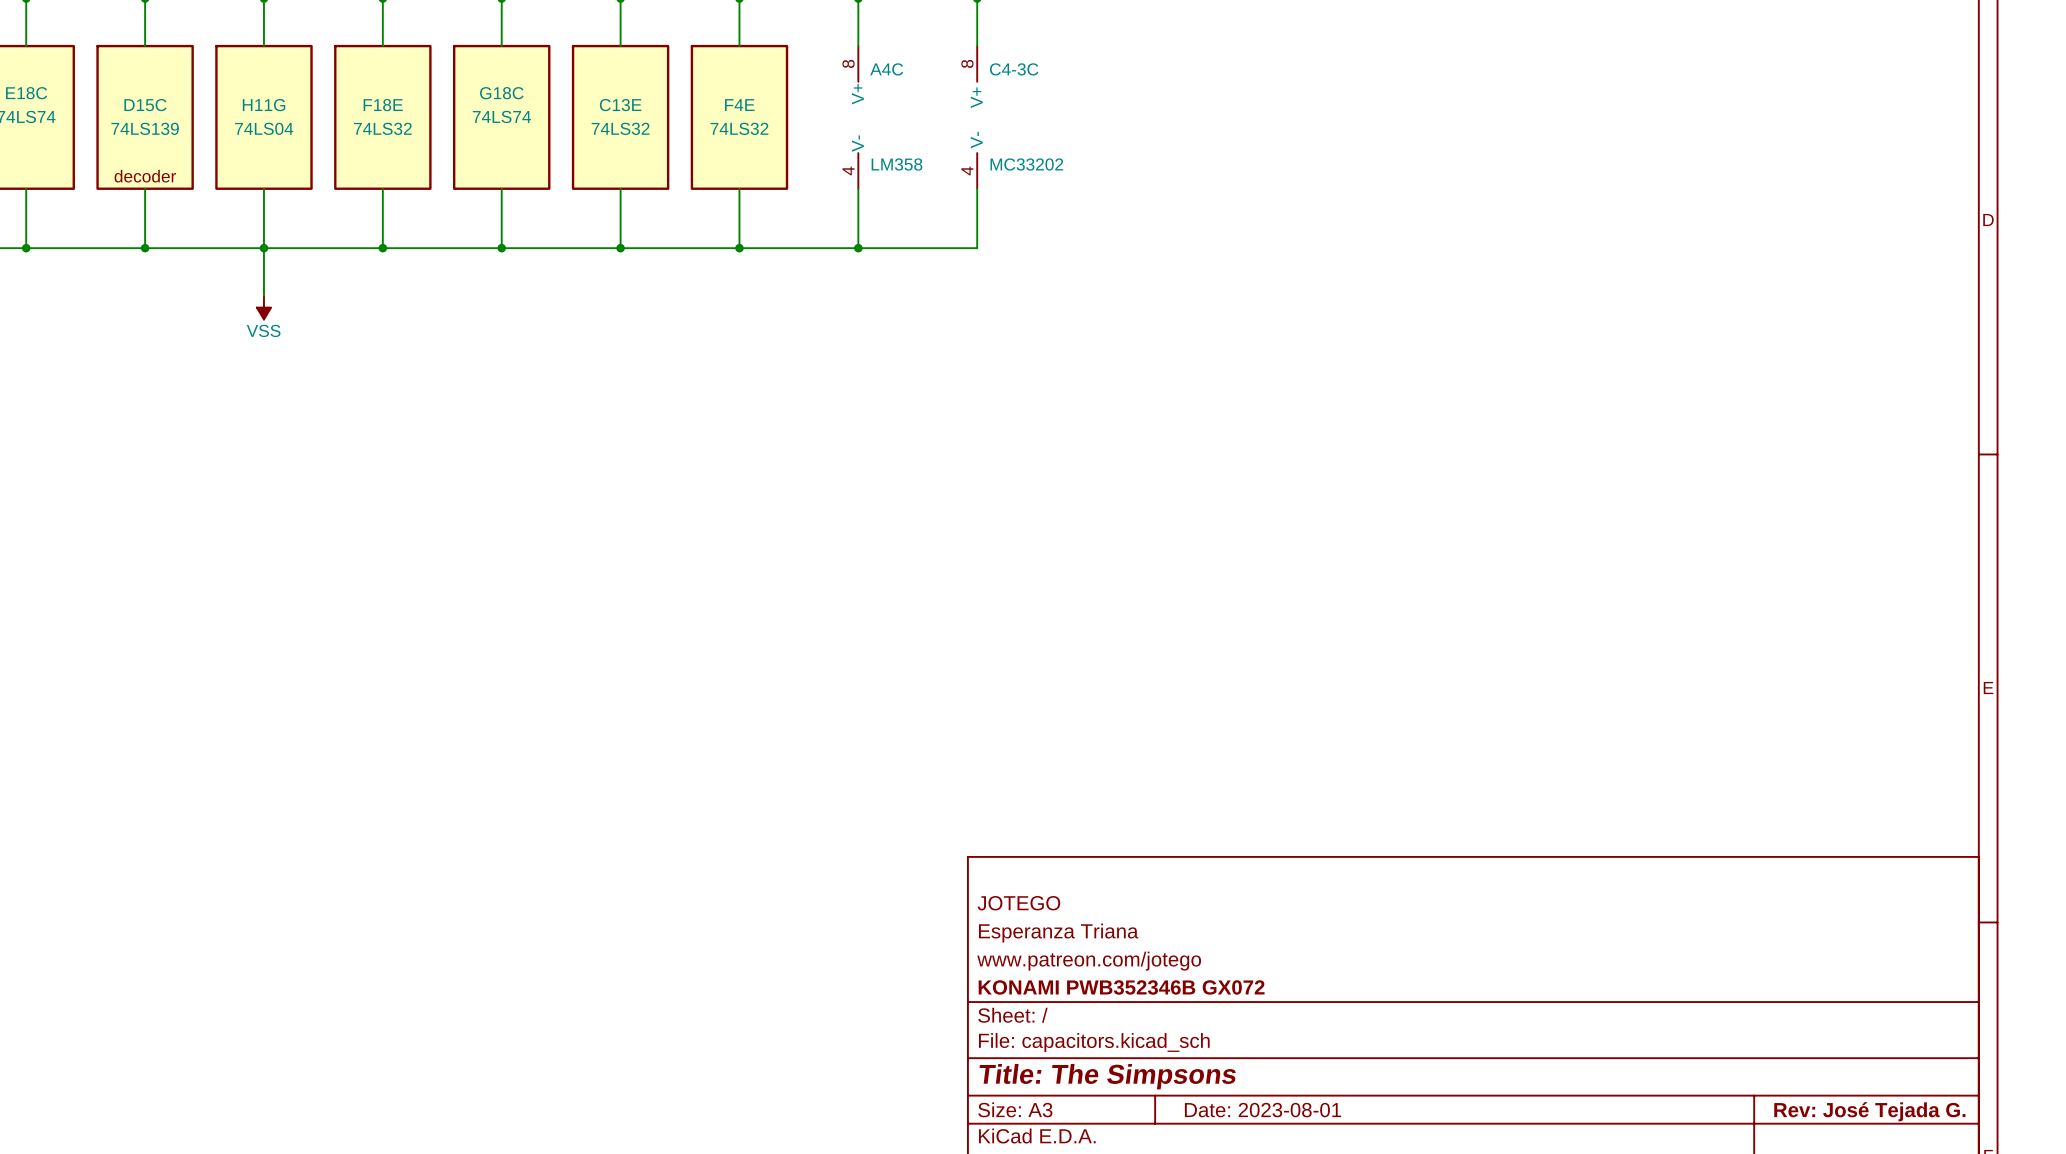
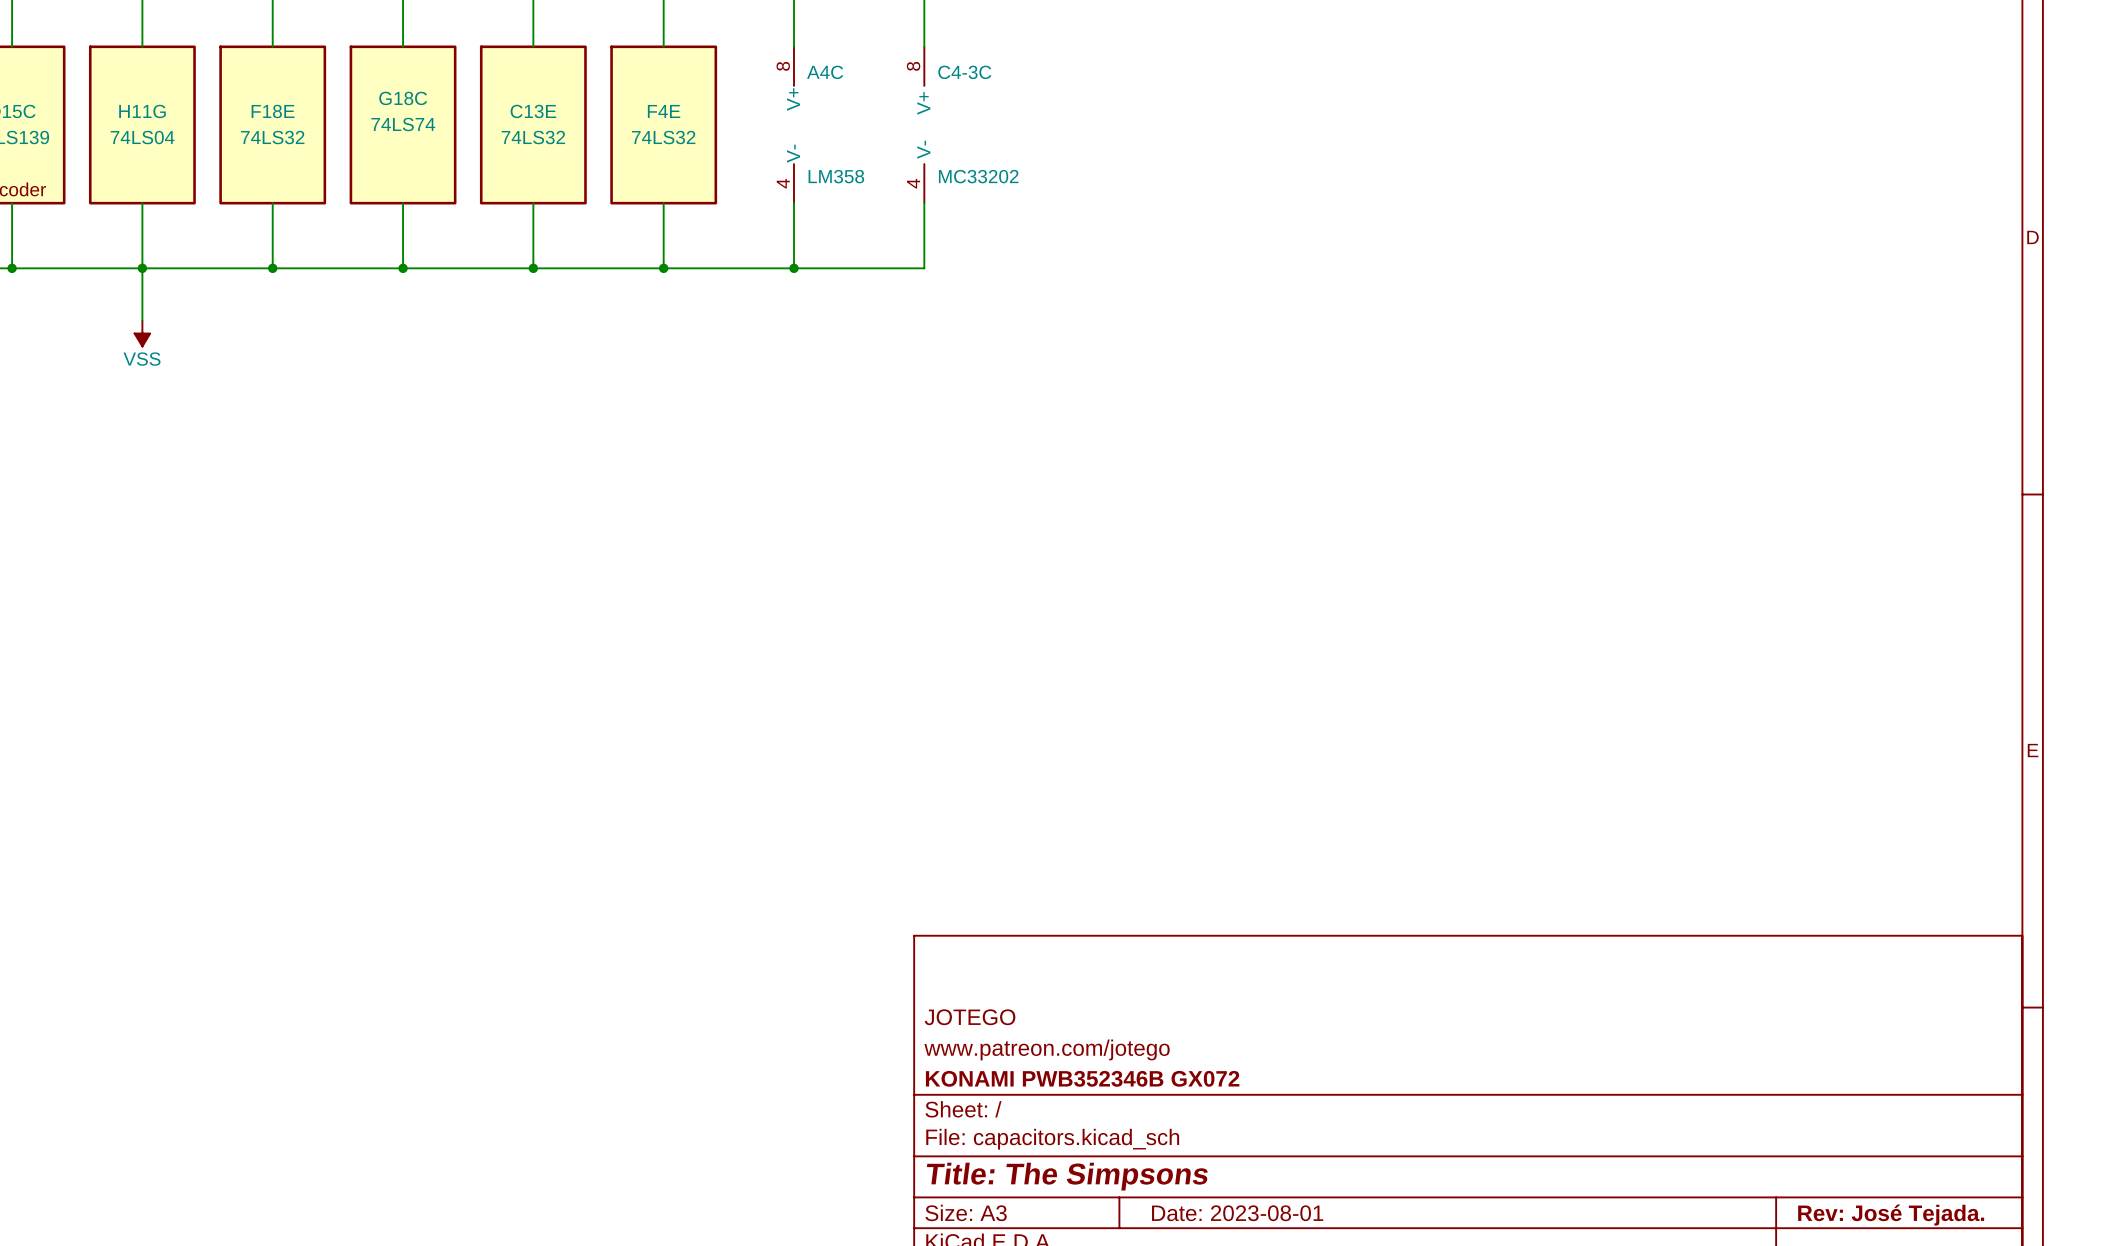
title block: JOTEGO (1018, 903) -> none
title block: Esperanza Triana (1058, 933) -> JOTEGO (970, 1017)
title block: Rev: José Tejada G. (1869, 1111) -> Rev: José Tejada. (1891, 1215)

